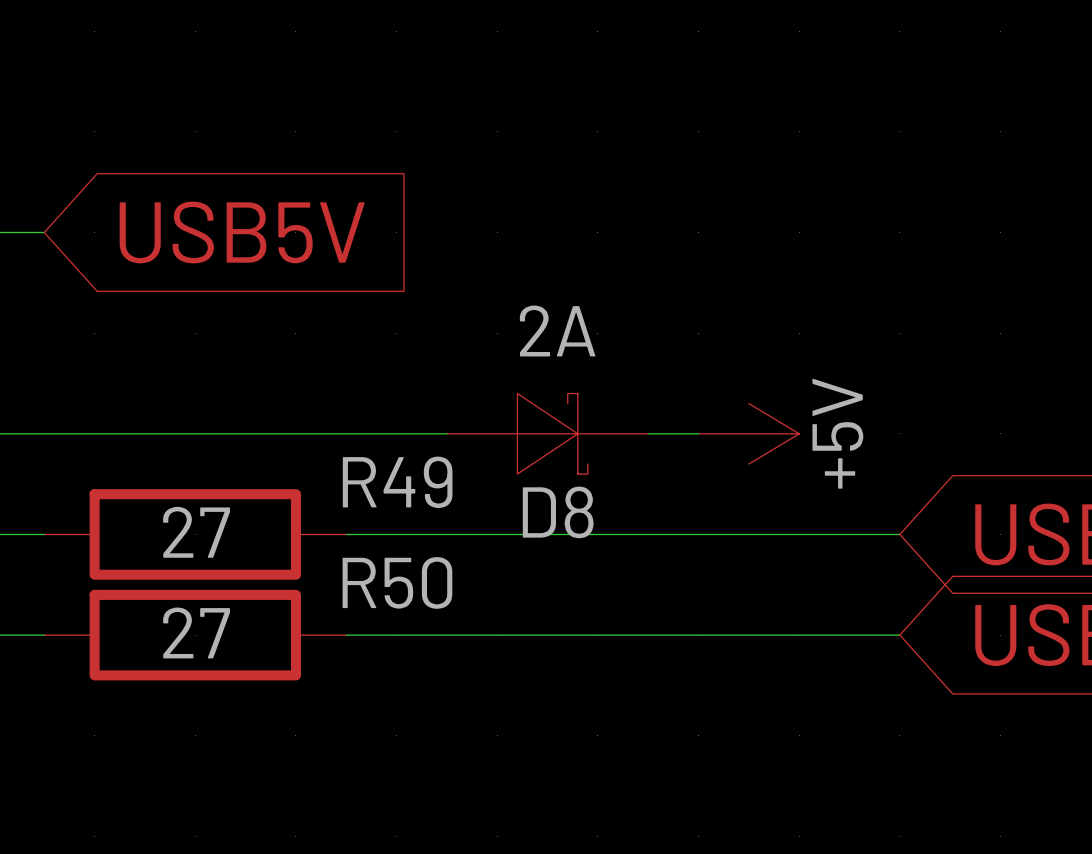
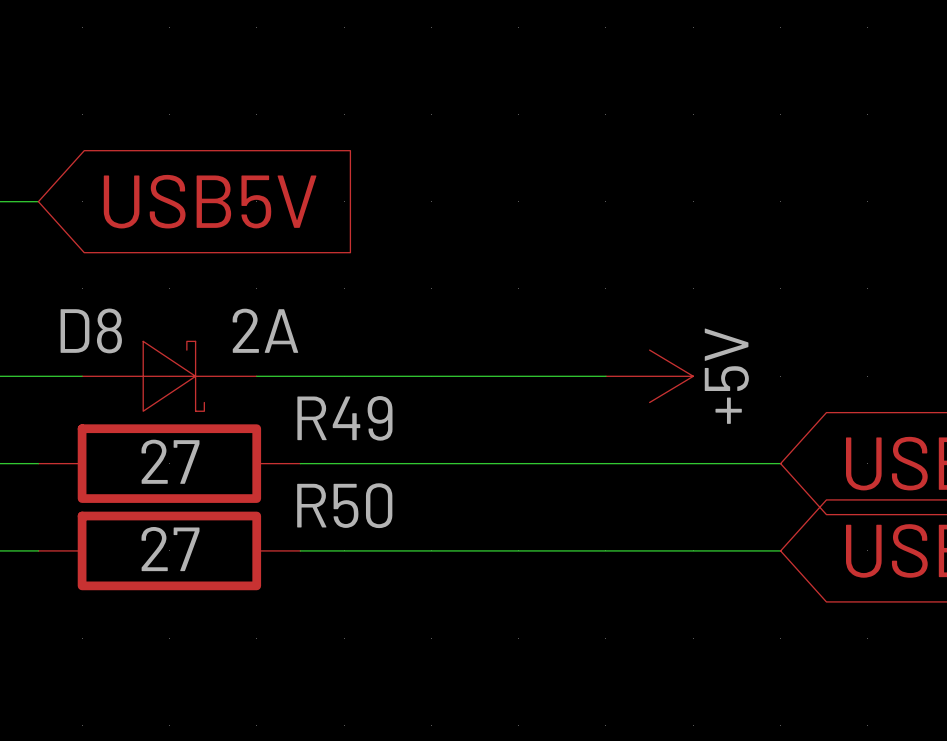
D8 value position: 2A (557, 330) -> 2A (265, 330)
D8 position: (547, 433) -> (169, 376)
D8 name position: D8 (558, 512) -> D8 (91, 330)

